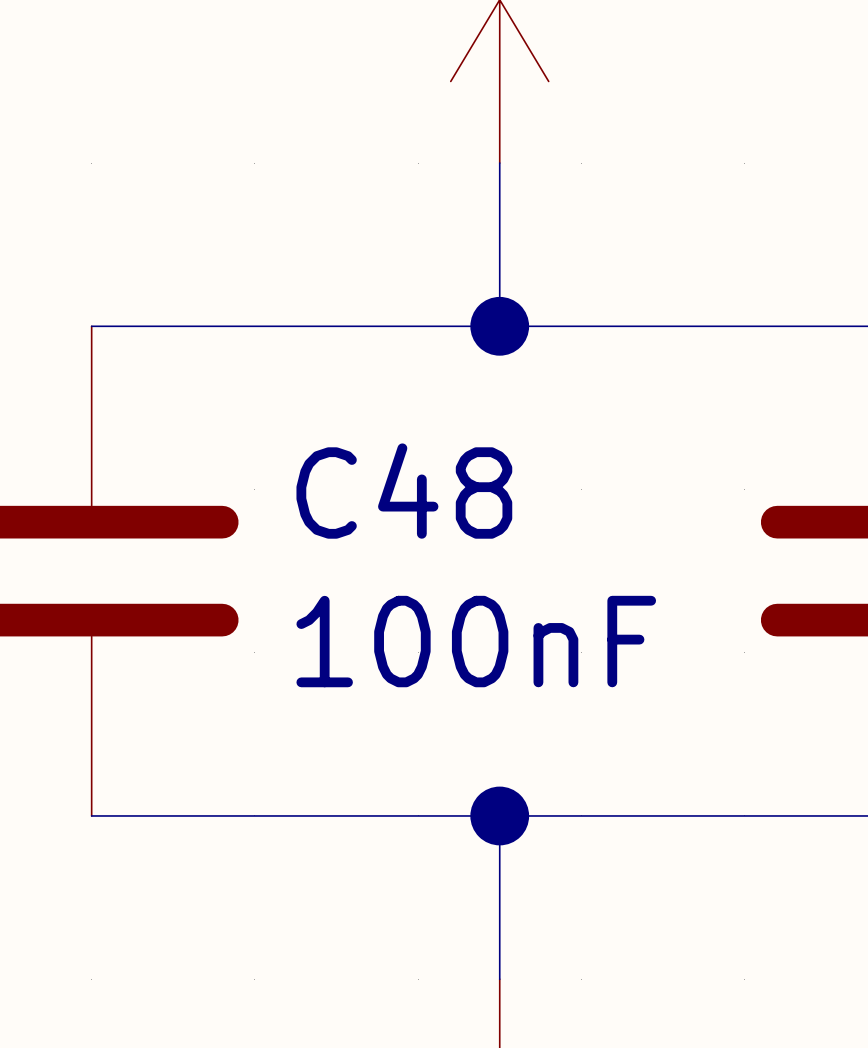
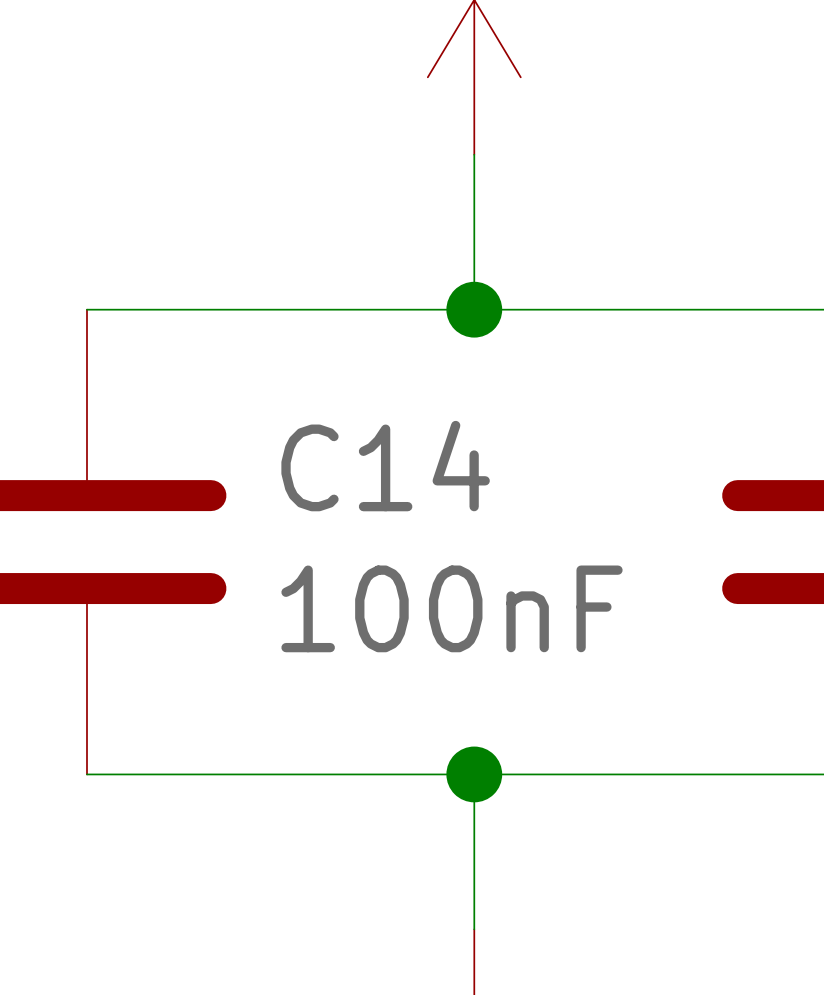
C48 name: C48 (404, 491) -> C14 (385, 466)

